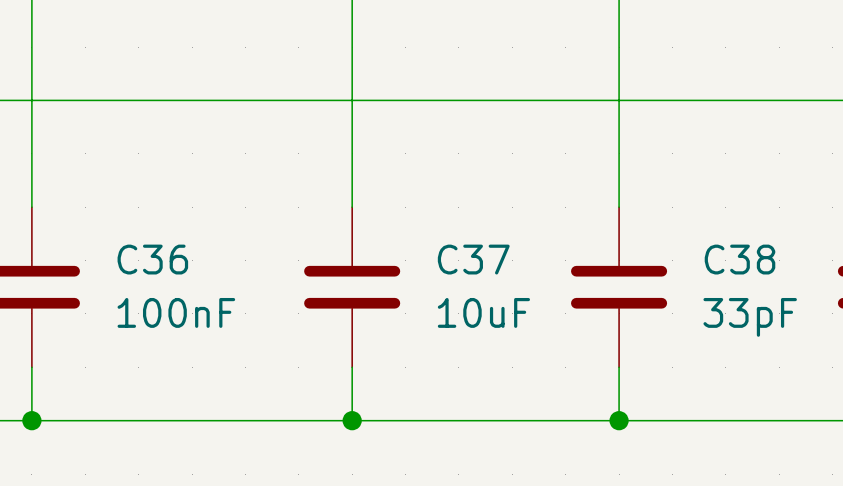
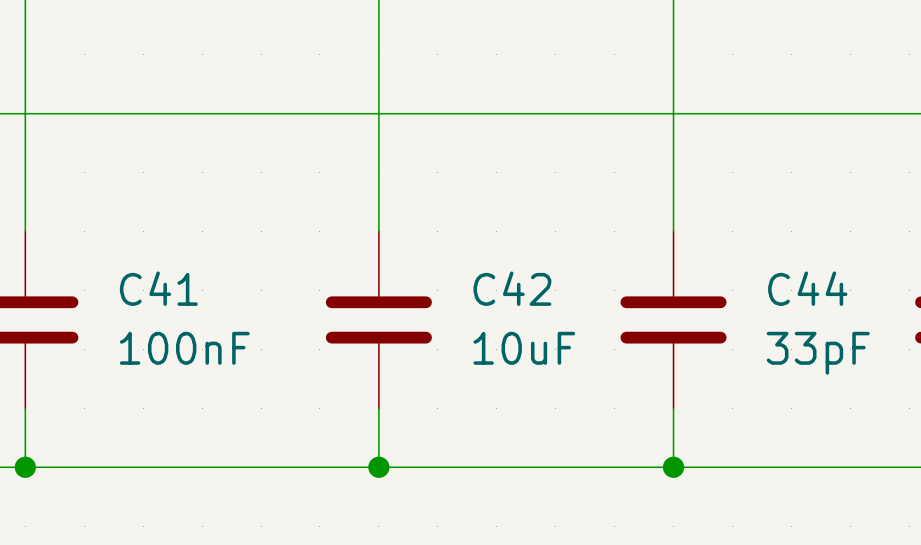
C36 name: C36 (152, 259) -> C41 (158, 288)
C37 name: C37 (473, 259) -> C42 (512, 288)
C38 name: C38 (740, 259) -> C44 (807, 288)

